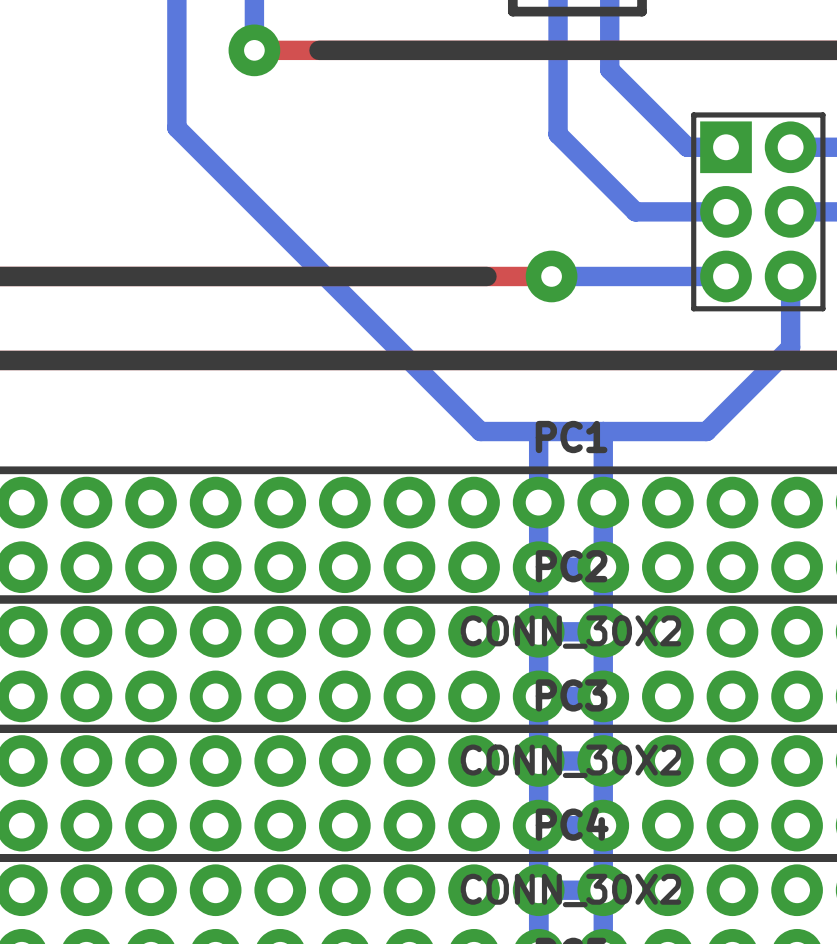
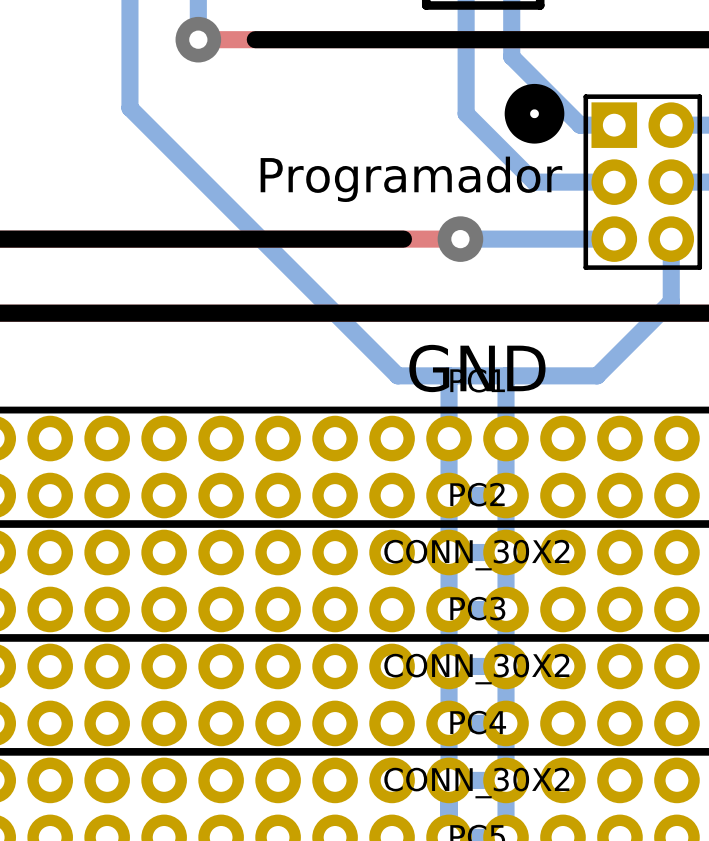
drawing: none -> [504, 83, 565, 144]
text: none -> Programador (411, 179)
text: none -> GND (477, 368)

